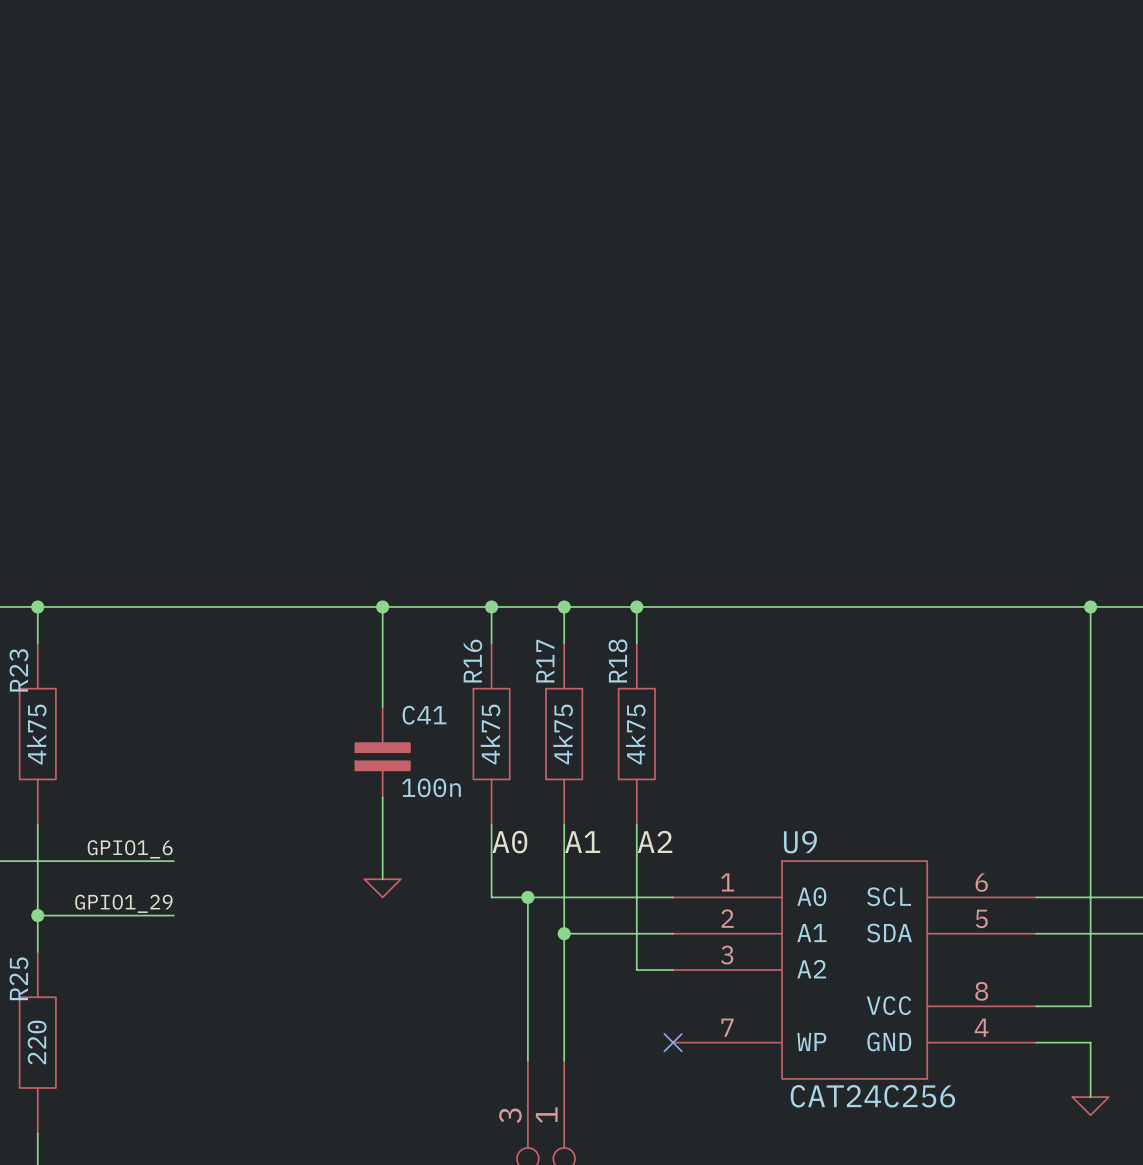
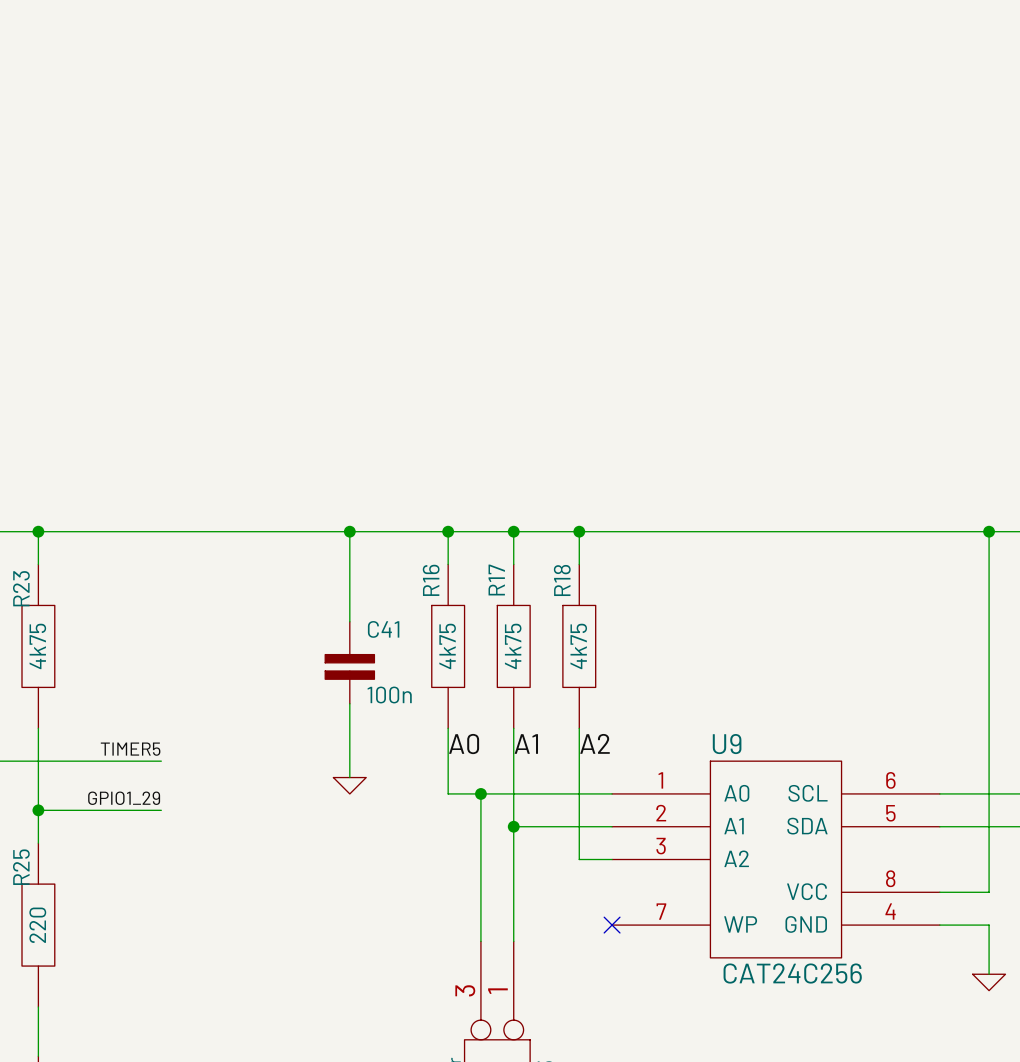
label: GPIO1_6 (130, 849) -> TIMER5 (130, 749)

